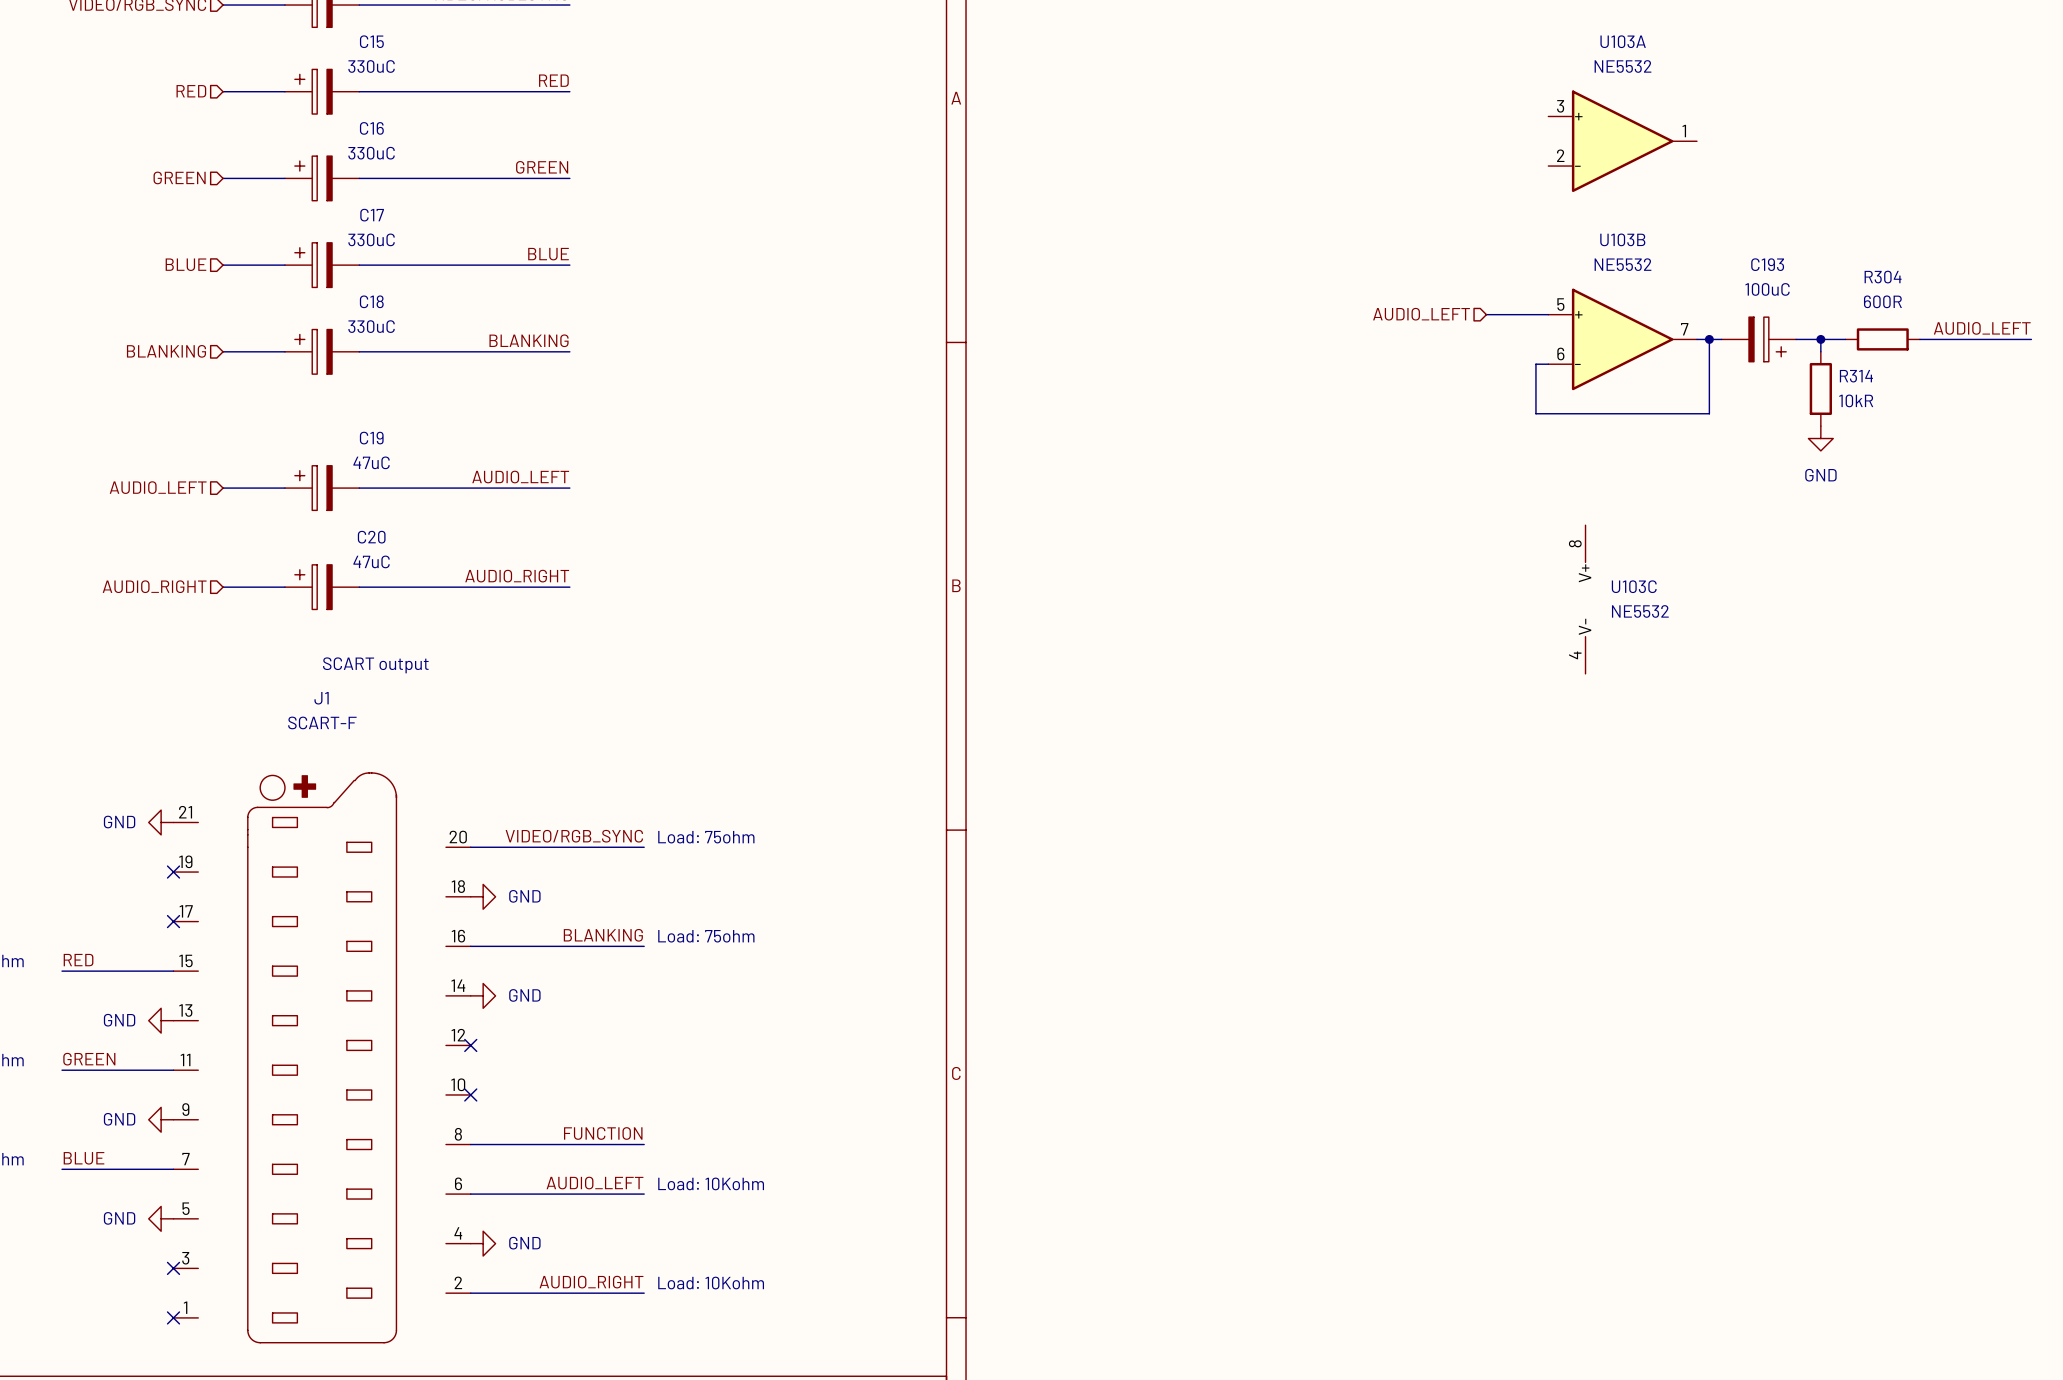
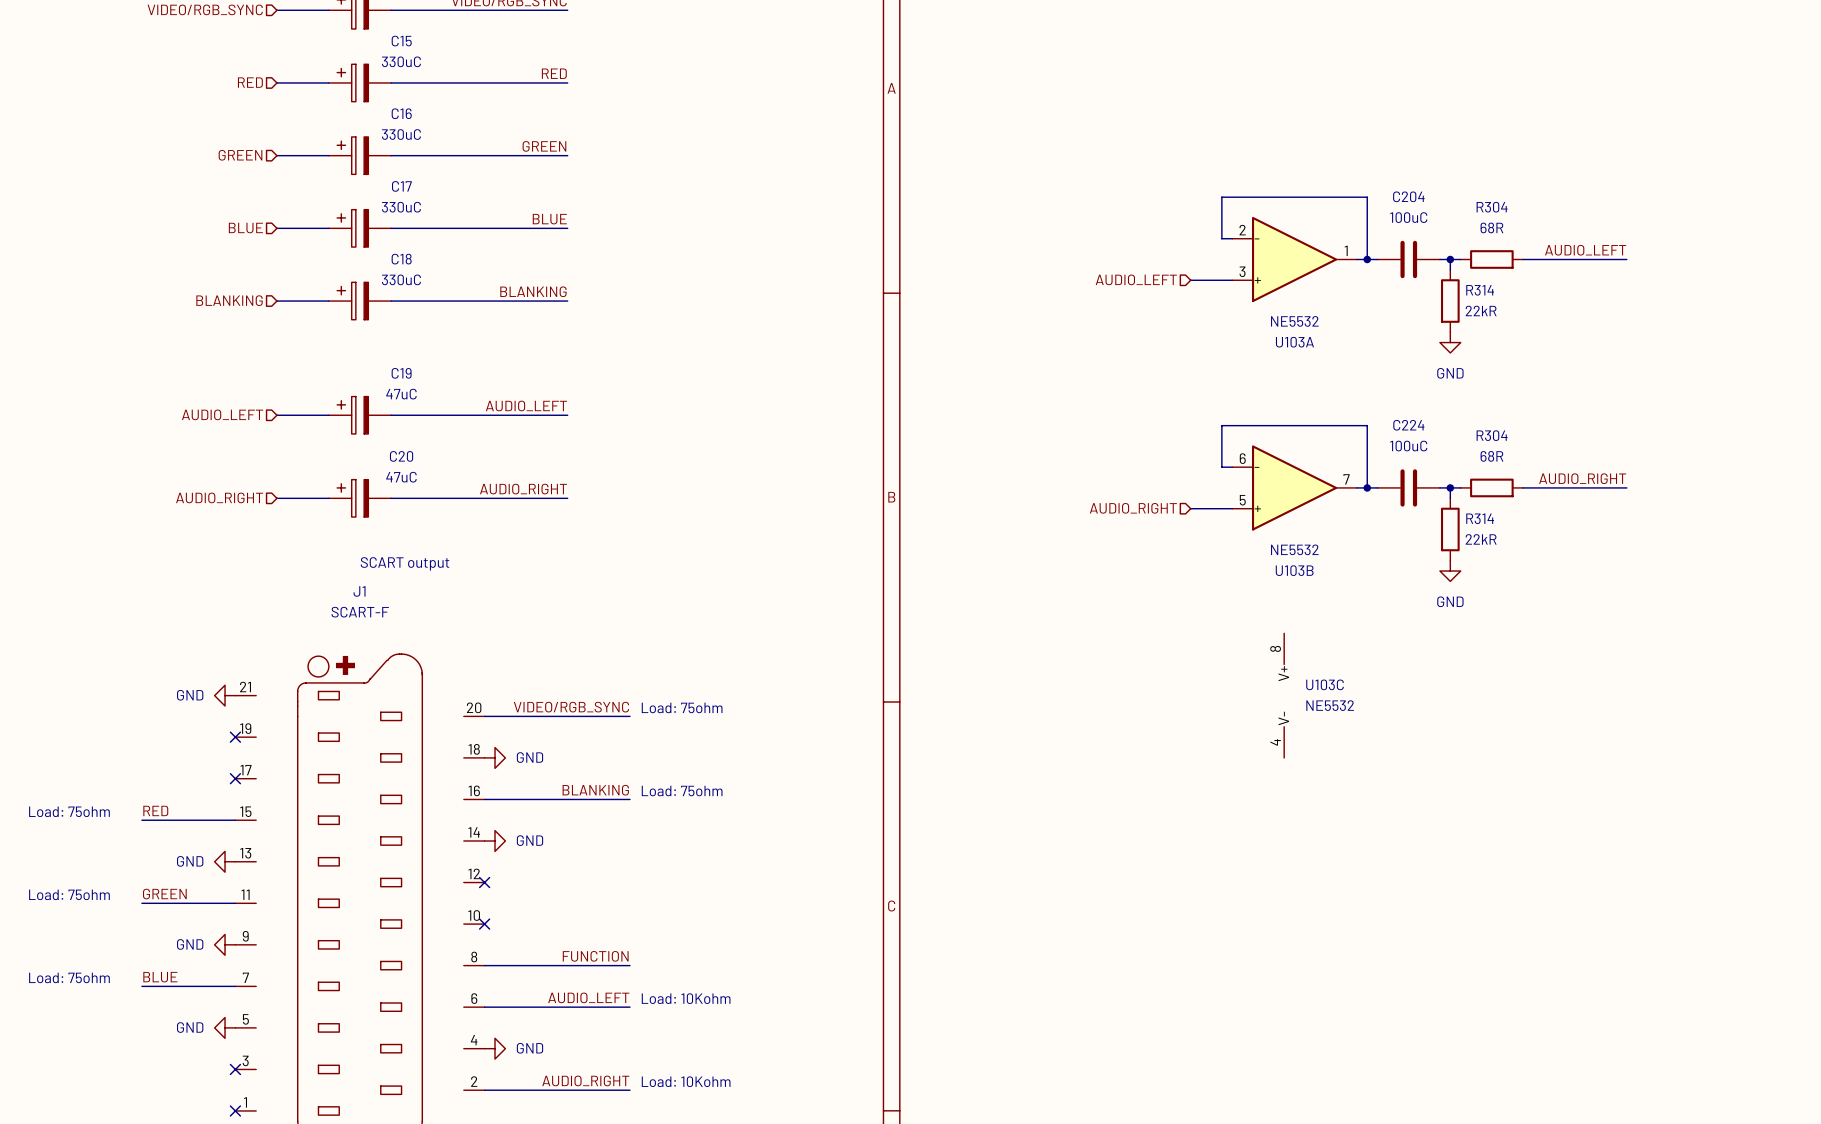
U103A flip: as is (1622, 141) -> up-down (1294, 259)
U103A position: (1622, 141) -> (1294, 259)
wire: none -> (1232, 238) (1221, 238) (1221, 197) (1367, 197) (1367, 259)
wire: none -> (1356, 259) (1377, 259)
junction: none -> (1367, 259)
C204: none -> 100uC (1408, 259)
junction: none -> (1450, 259)
R304: none -> 68R (1491, 259)
wire: none -> (1523, 259) (1626, 259)
hierarchical label position: AUDIO_LEFT (1421, 314) -> AUDIO_LEFT (1136, 279)
wire: (1486, 314) (1548, 314) -> none
wire: none -> (1190, 280) (1232, 280)
label position: AUDIO_LEFT (1982, 328) -> AUDIO_LEFT (1585, 250)
U103B flip: as is (1622, 339) -> up-down (1294, 487)
U103B position: (1622, 339) -> (1294, 487)
wire: (1696, 339) (1721, 339) -> (1439, 259) (1460, 259)
wire: (1709, 339) (1709, 413) (1535, 413) (1535, 364) (1548, 364) -> none
junction: (1709, 339) -> none
C193: 100uC (1758, 339) -> none
wire: (1796, 339) (1845, 339) -> none
wire: (1820, 339) (1820, 351) -> (1450, 259) (1450, 269)
junction: (1820, 339) -> none
R304: 600R (1882, 339) -> none
wire: (1919, 339) (2031, 339) -> none
R314: none -> 22kR (1450, 301)
R314: 10kR (1820, 388) -> none
power symbol: none -> GND (1450, 342)
power symbol: GND (1820, 438) -> none
wire: none -> (1232, 467) (1221, 467) (1221, 425) (1367, 425) (1367, 487)
label: none -> AUDIO_RIGHT (1582, 478)
wire: none -> (1356, 487) (1377, 487)
junction: none -> (1367, 487)
C224: none -> 100uC (1408, 487)
wire: none -> (1439, 487) (1460, 487)
wire: none -> (1450, 487) (1450, 498)
junction: none -> (1450, 487)
R304: none -> 68R (1491, 487)
wire: none -> (1523, 487) (1626, 487)
hierarchical label: none -> AUDIO_RIGHT (1133, 508)
wire: none -> (1190, 508) (1232, 508)
U103C position: (1585, 599) -> (1284, 695)
R314: none -> 22kR (1450, 529)
power symbol: none -> GND (1450, 571)

